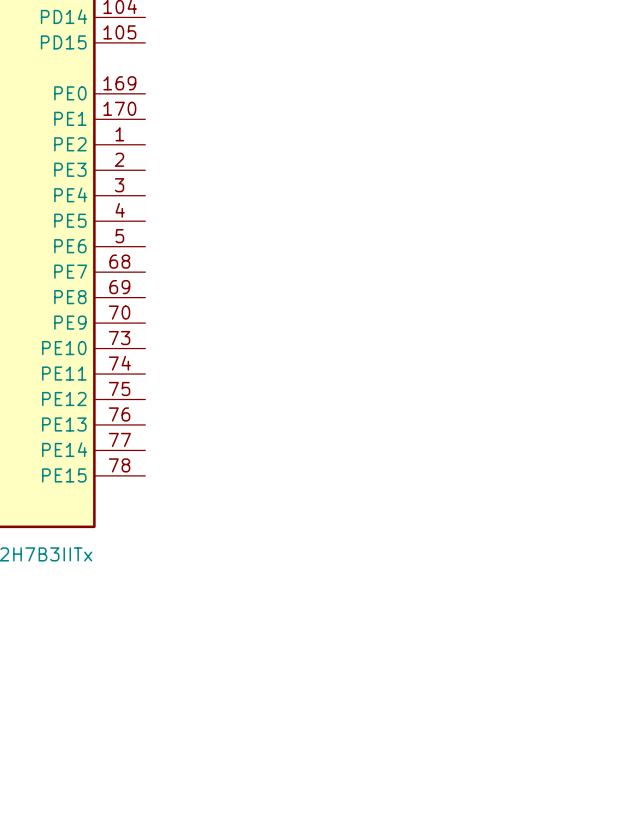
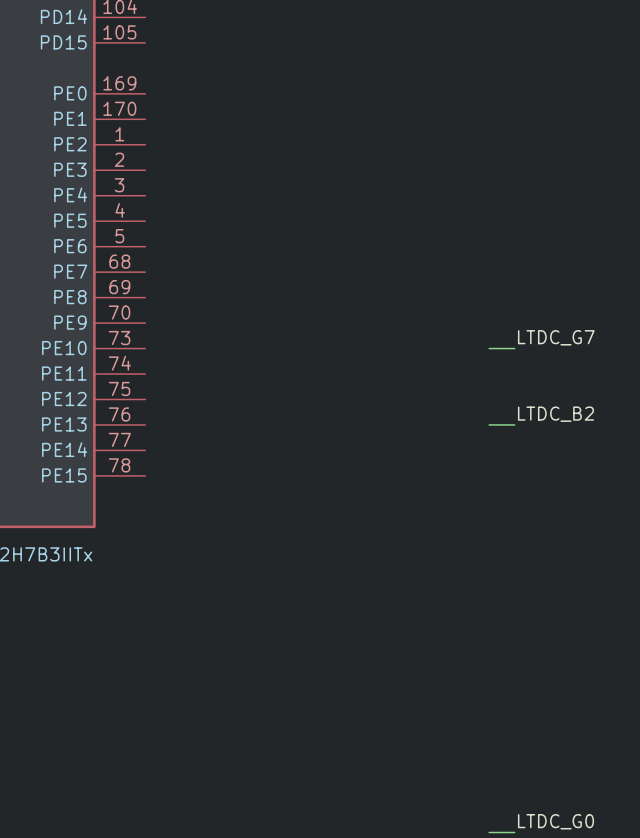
label: none -> LTDC_G7 (556, 337)
wire: none -> (489, 348) (514, 348)
label: none -> LTDC_B2 (555, 414)
wire: none -> (489, 424) (514, 424)
label: none -> LTDC_G0 (555, 821)
wire: none -> (489, 832) (514, 832)

